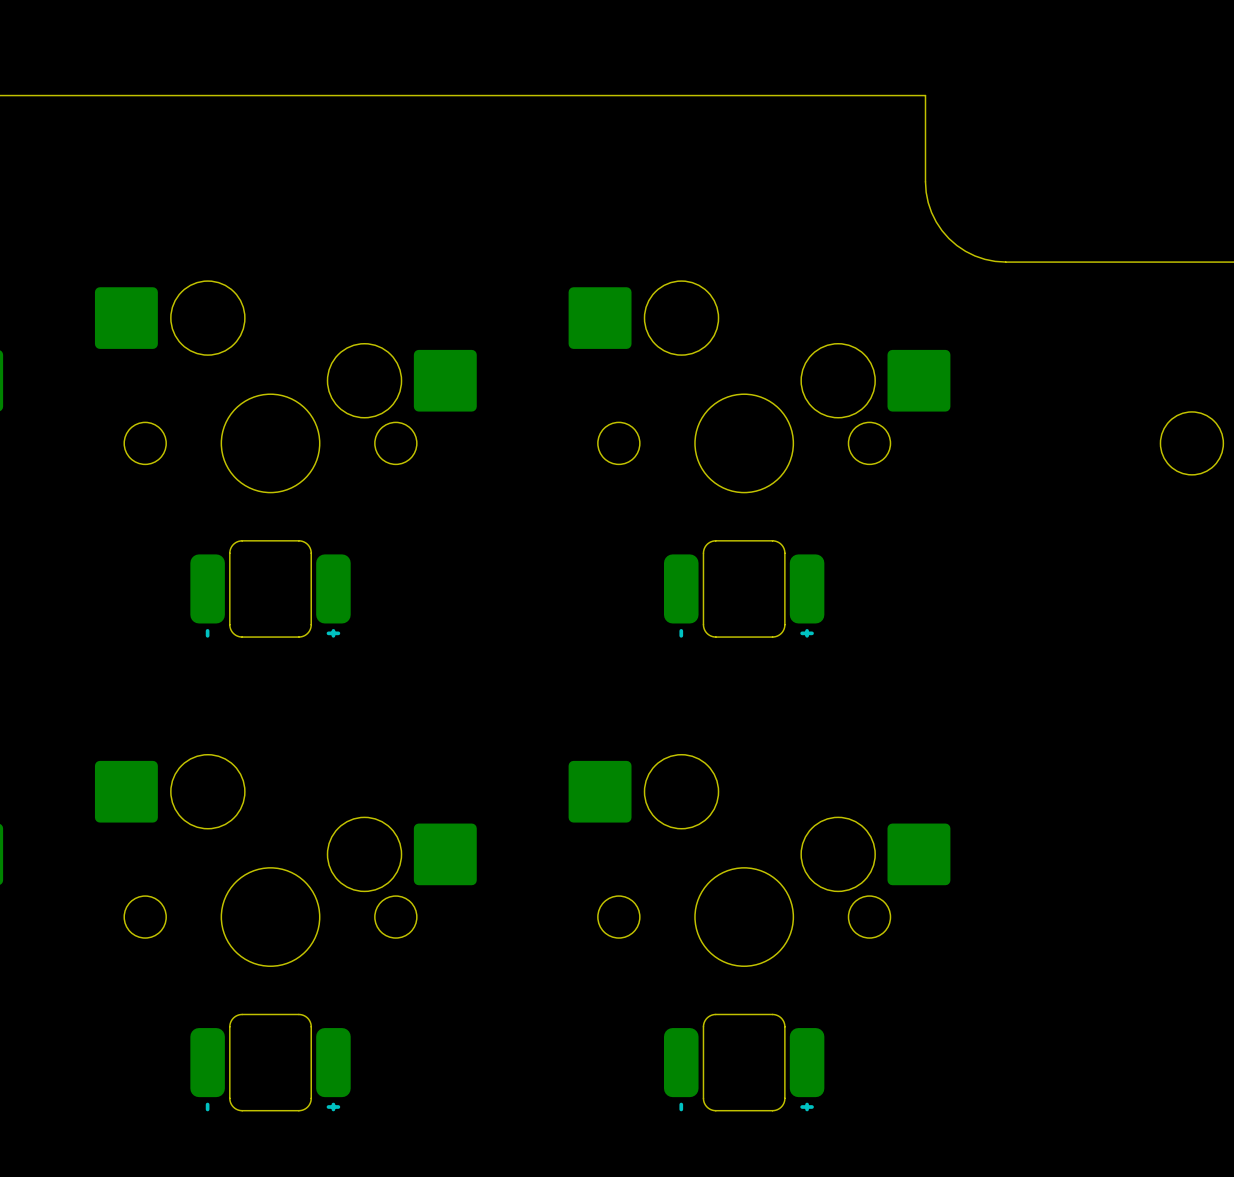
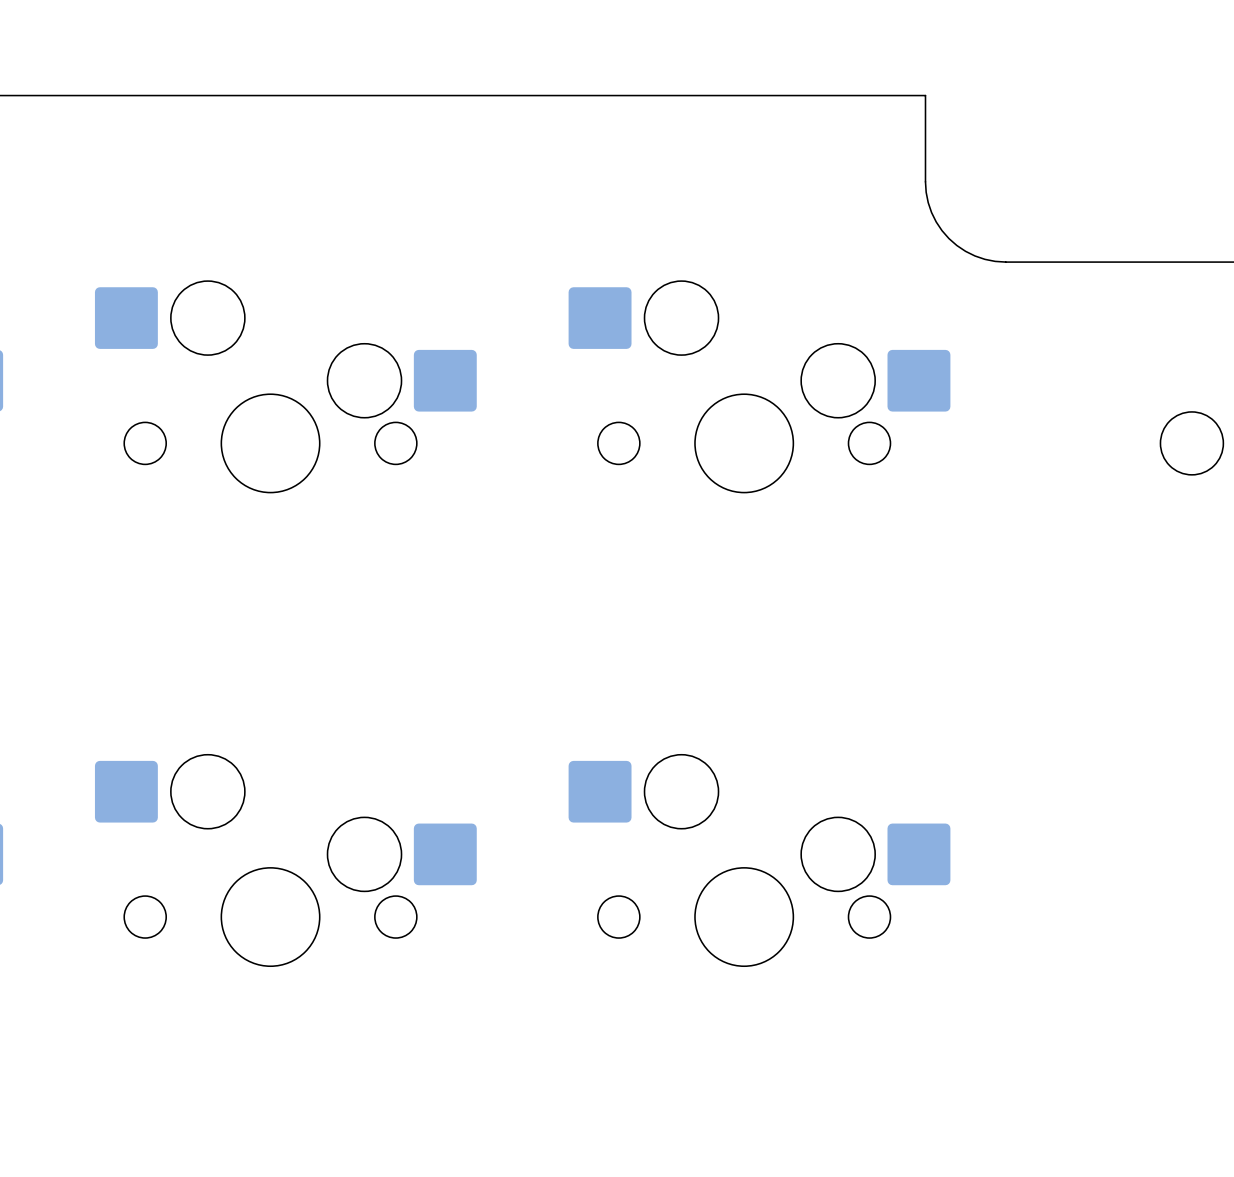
part: (270, 588) -> none
part: (744, 588) -> none
part: (270, 1062) -> none
part: (744, 1062) -> none

